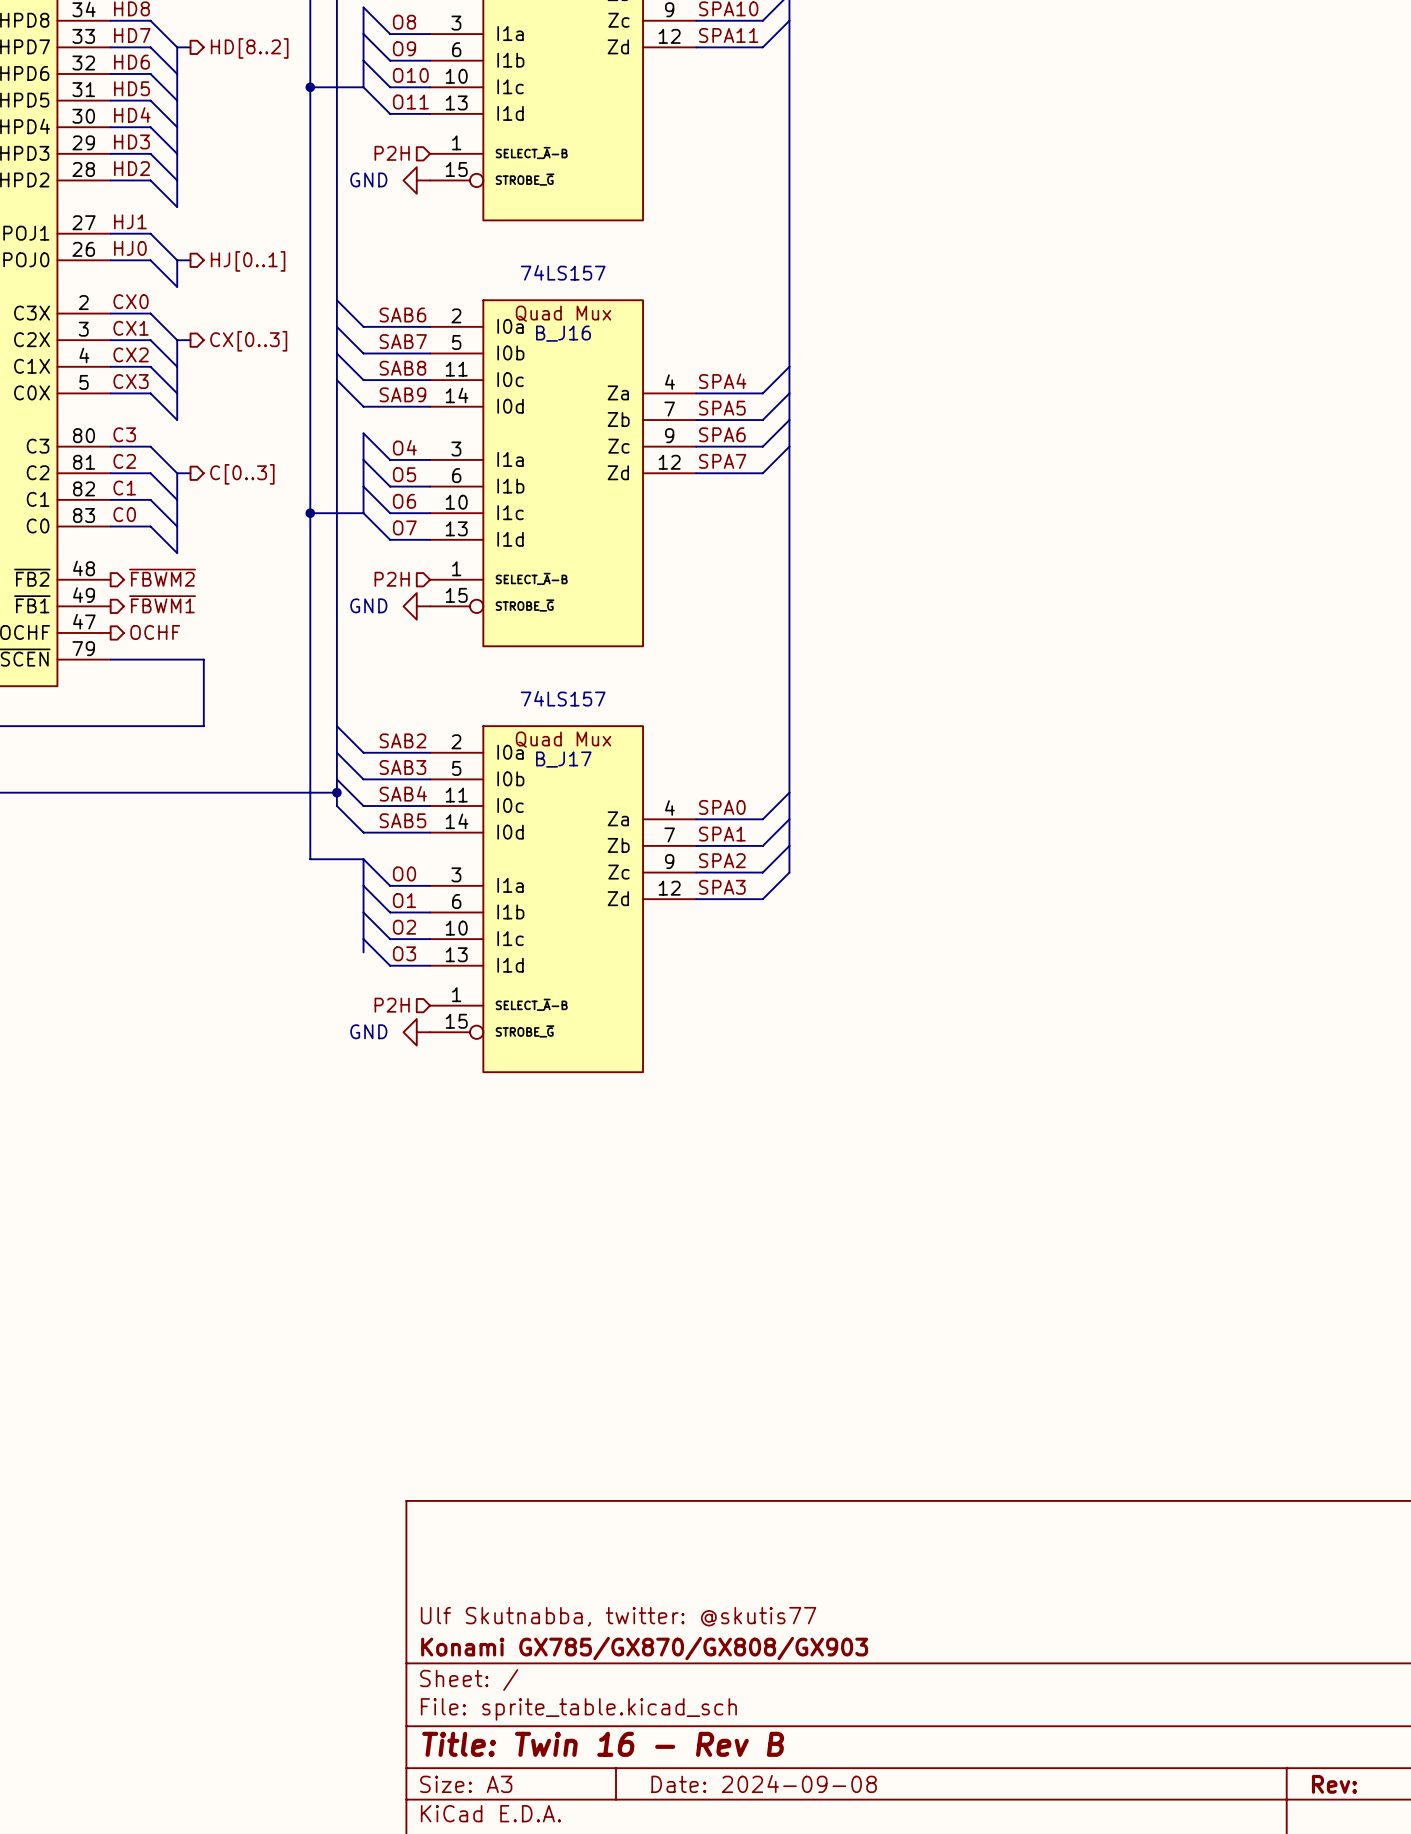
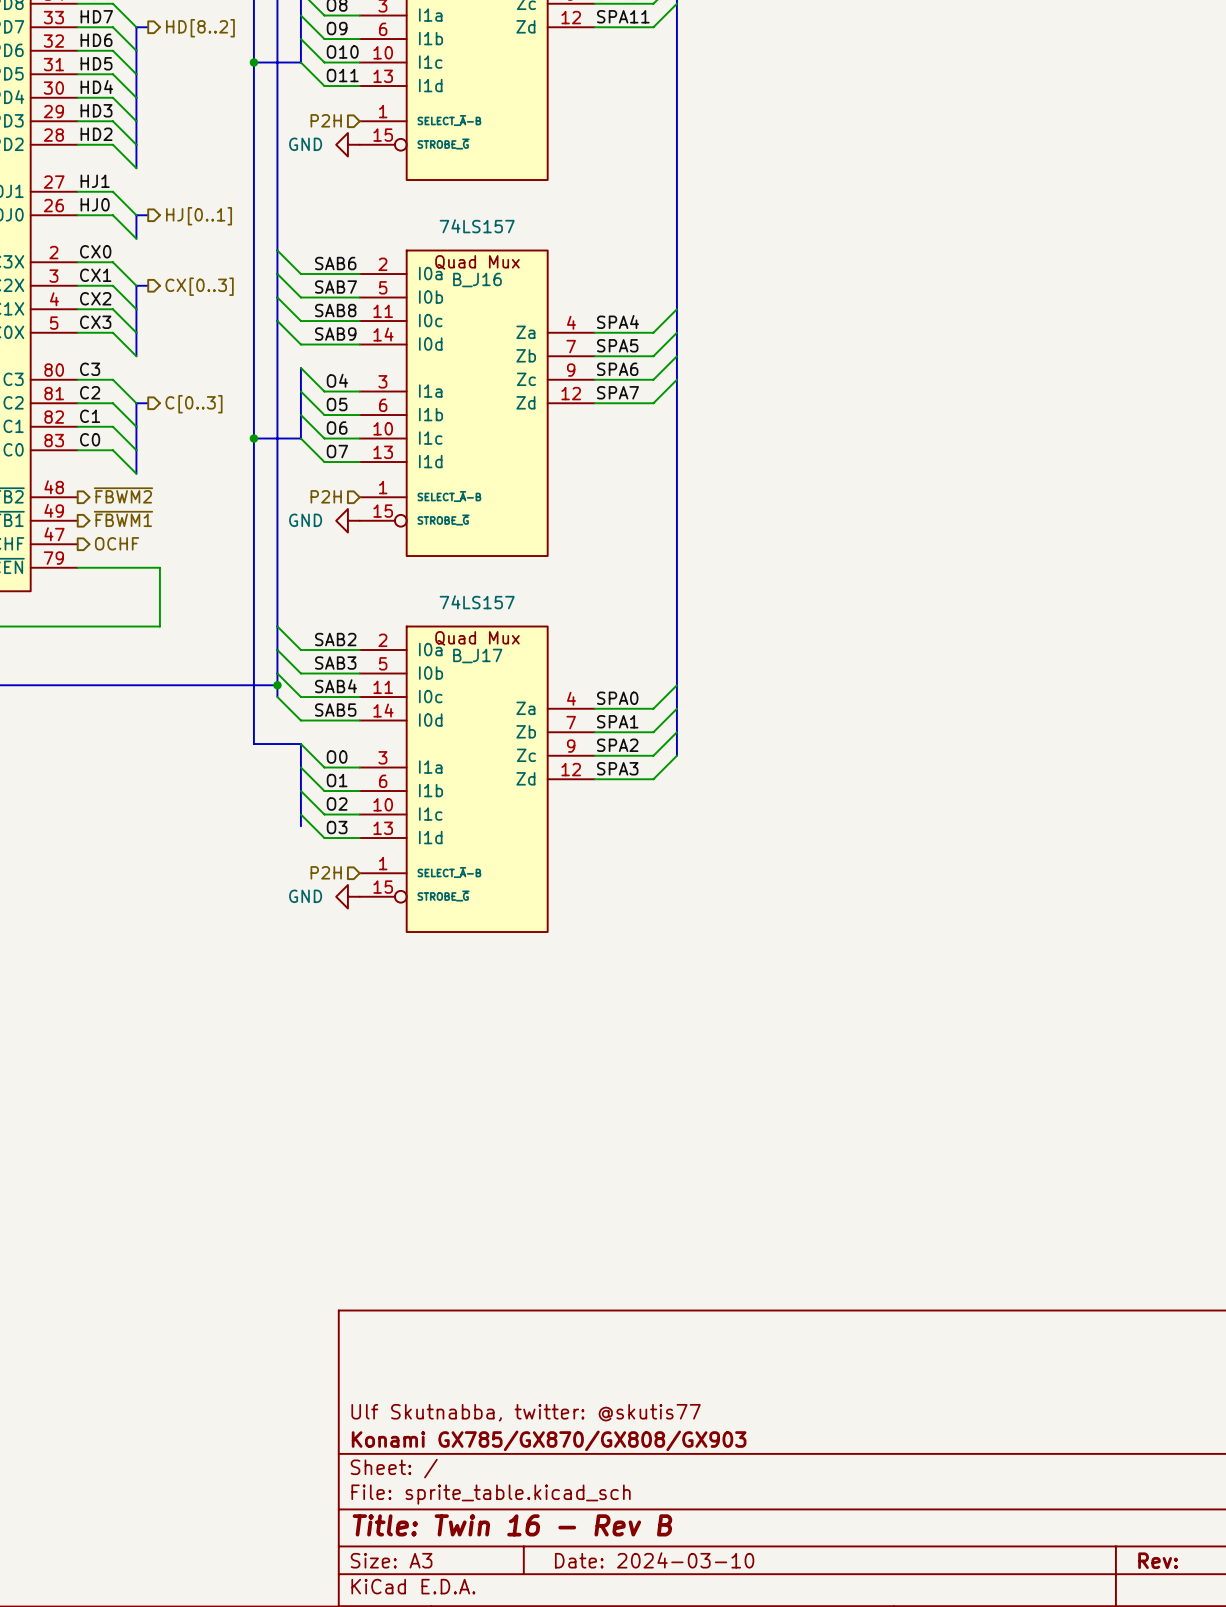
title block: Date: 2024-09-08 (764, 1783) -> Date: 2024-03-10 (654, 1560)

